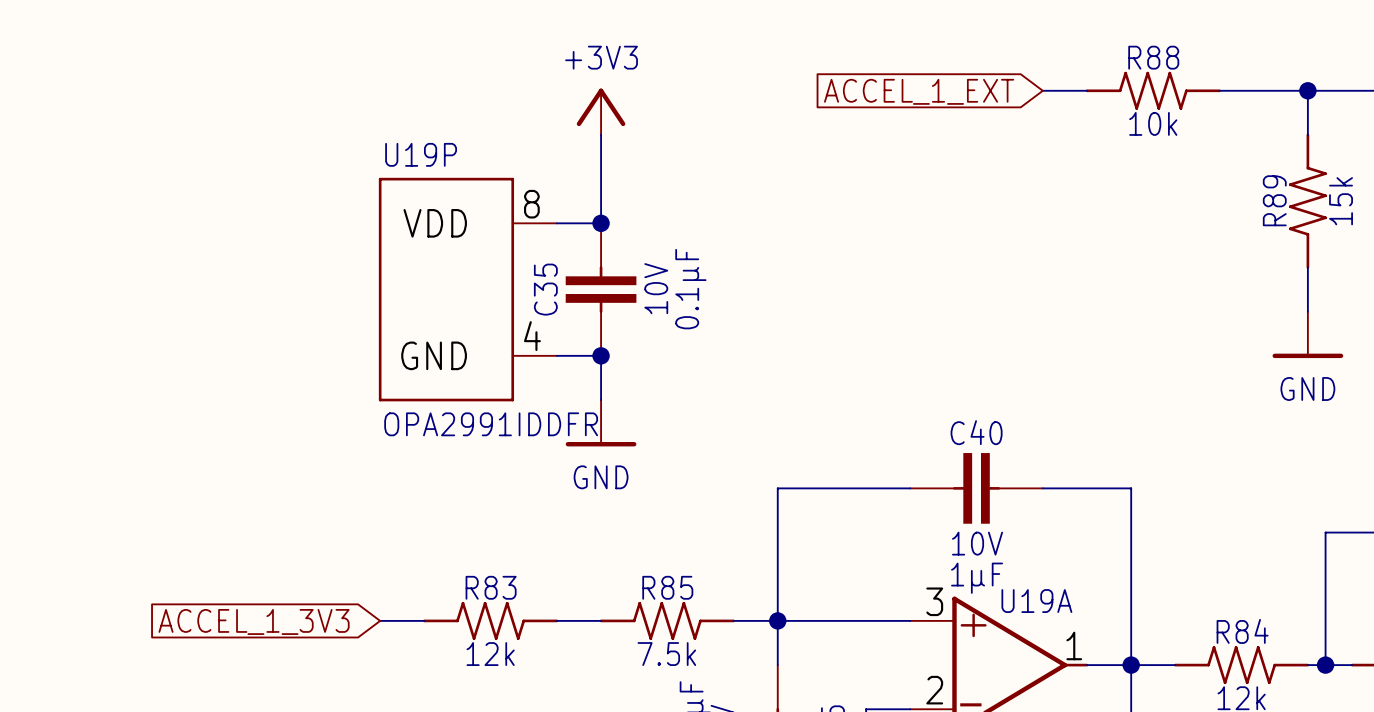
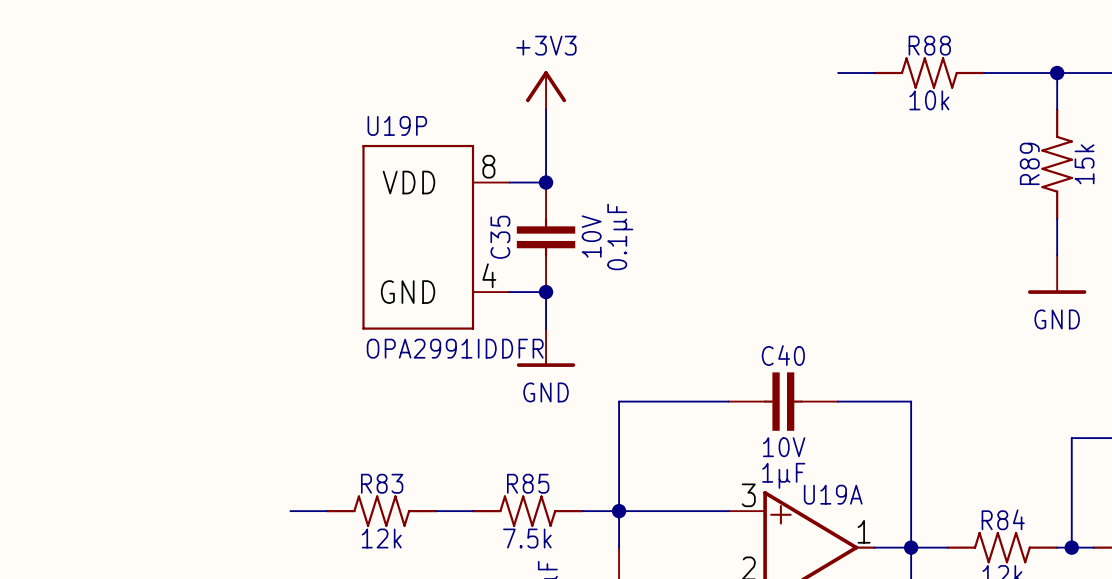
global label: ACCEL_1_EXT (919, 91) -> none
power symbol position: +3V3 (601, 111) -> +3V3 (546, 90)
wire: (601, 134) (601, 223) (556, 223) -> (546, 109) (546, 182) (509, 182)
junction: (601, 223) -> none
junction: none -> (546, 182)
U19P position: (467, 289) -> (435, 237)
C35 position: (601, 289) -> (546, 237)
wire: (556, 355) (601, 355) (601, 400) -> (509, 292) (546, 292) (546, 328)
junction: (601, 355) -> none
junction: none -> (546, 292)
power symbol position: GND (601, 423) -> GND (546, 347)
global label: ACCEL_1_3V3 (254, 621) -> none

